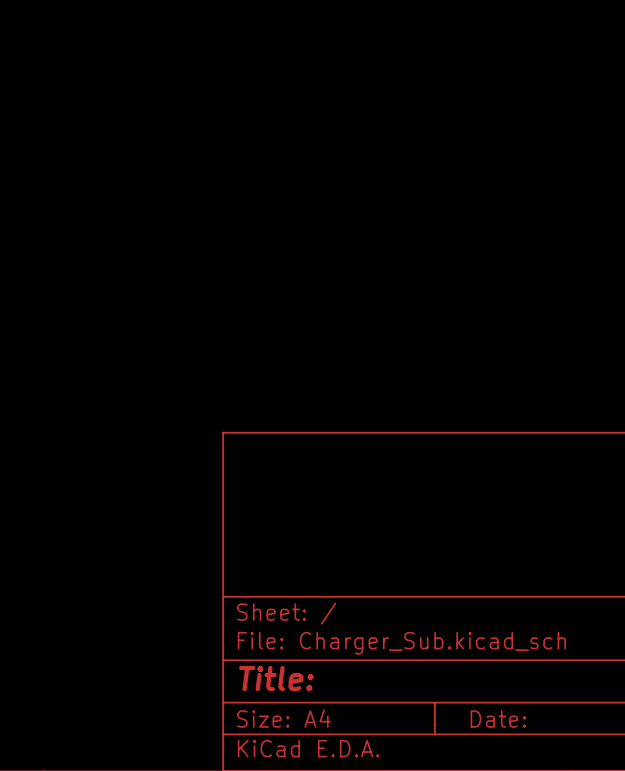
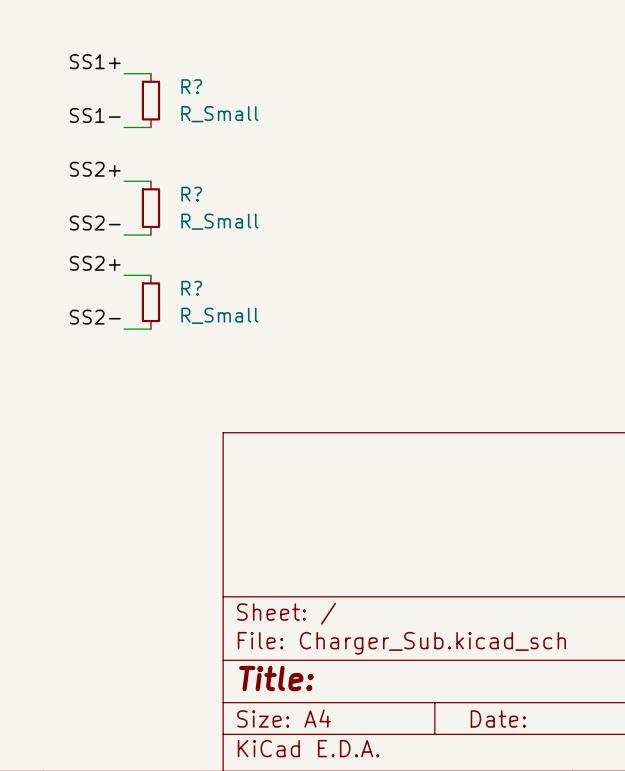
label: none -> SS1+ (95, 61)
wire: none -> (124, 73) (150, 73)
R?: none -> R_Small (150, 100)
label: none -> SS1- (95, 115)
wire: none -> (124, 127) (150, 127)
label: none -> SS2+ (95, 169)
wire: none -> (124, 181) (150, 181)
R?: none -> R_Small (150, 208)
label: none -> SS2- (95, 223)
wire: none -> (124, 235) (150, 235)
label: none -> SS2+ (95, 263)
wire: none -> (124, 275) (150, 275)
R?: none -> R_Small (150, 302)
label: none -> SS2- (95, 317)
wire: none -> (124, 329) (150, 329)

